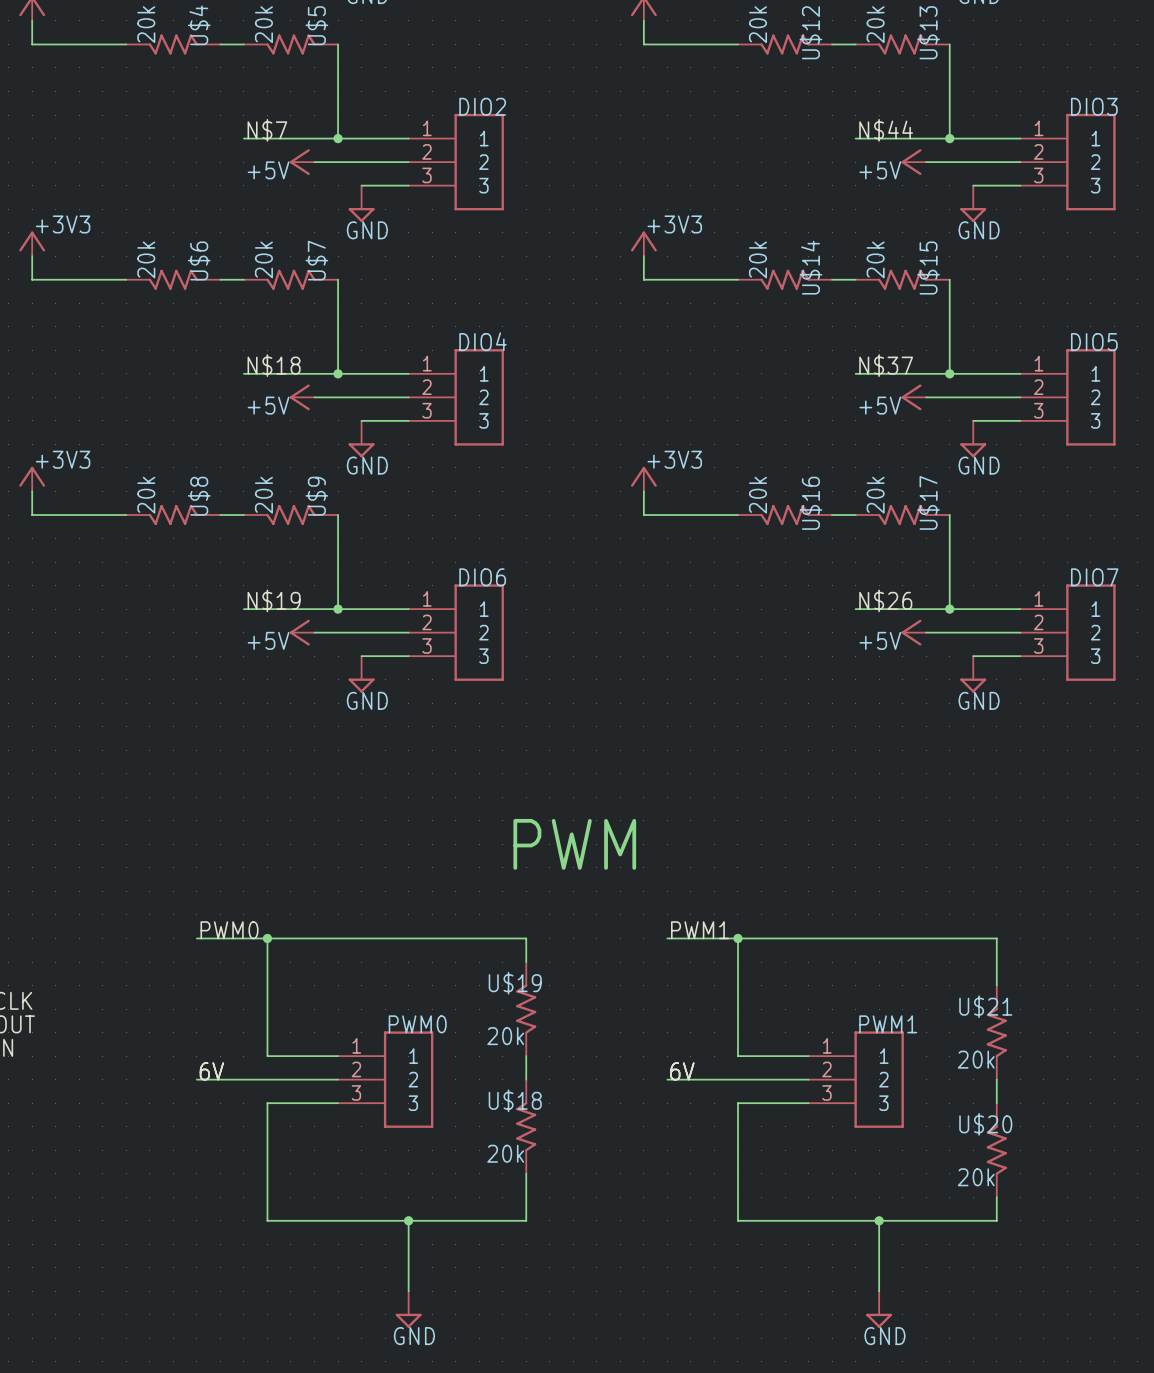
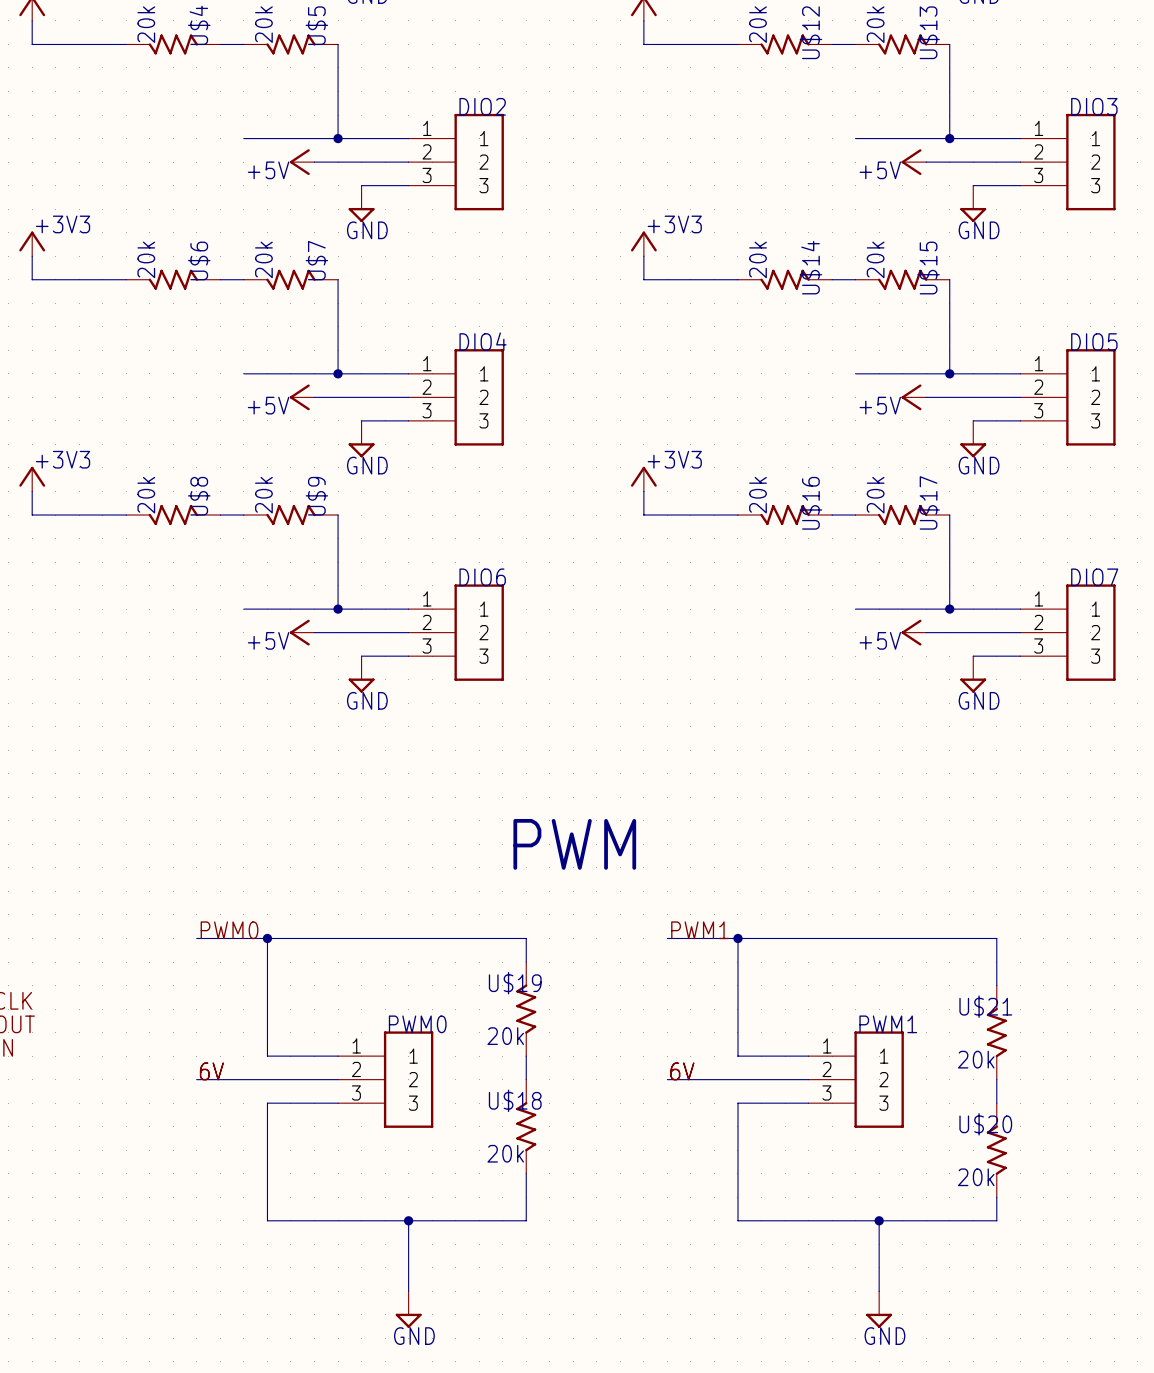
label: N$7 (267, 130) -> none
label: N$44 (886, 130) -> none
label: N$18 (274, 365) -> none
label: N$37 (886, 365) -> none
label: N$19 (274, 600) -> none
label: N$26 (885, 600) -> none

